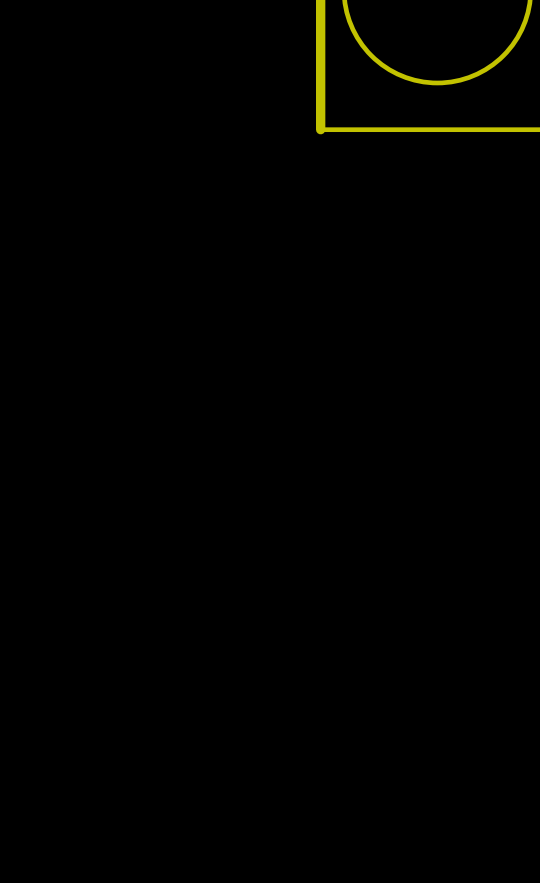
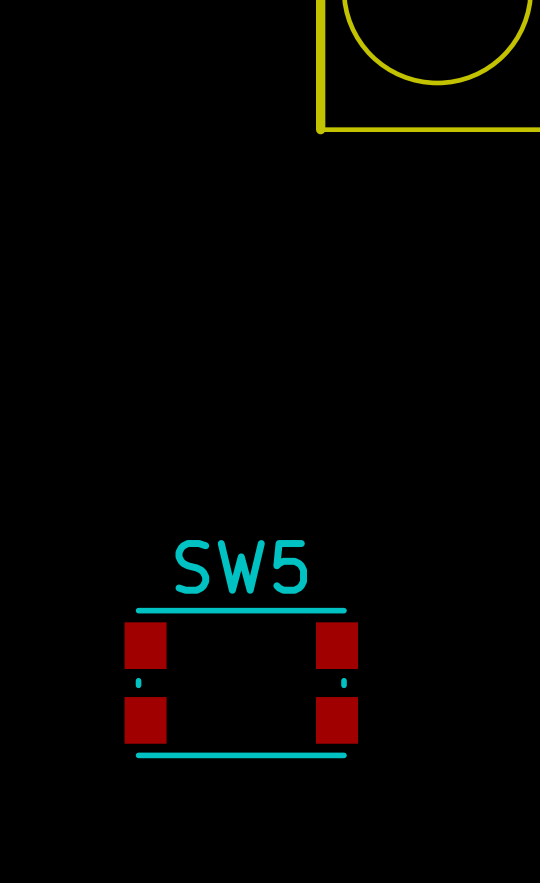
SW5: none -> (241, 683)

